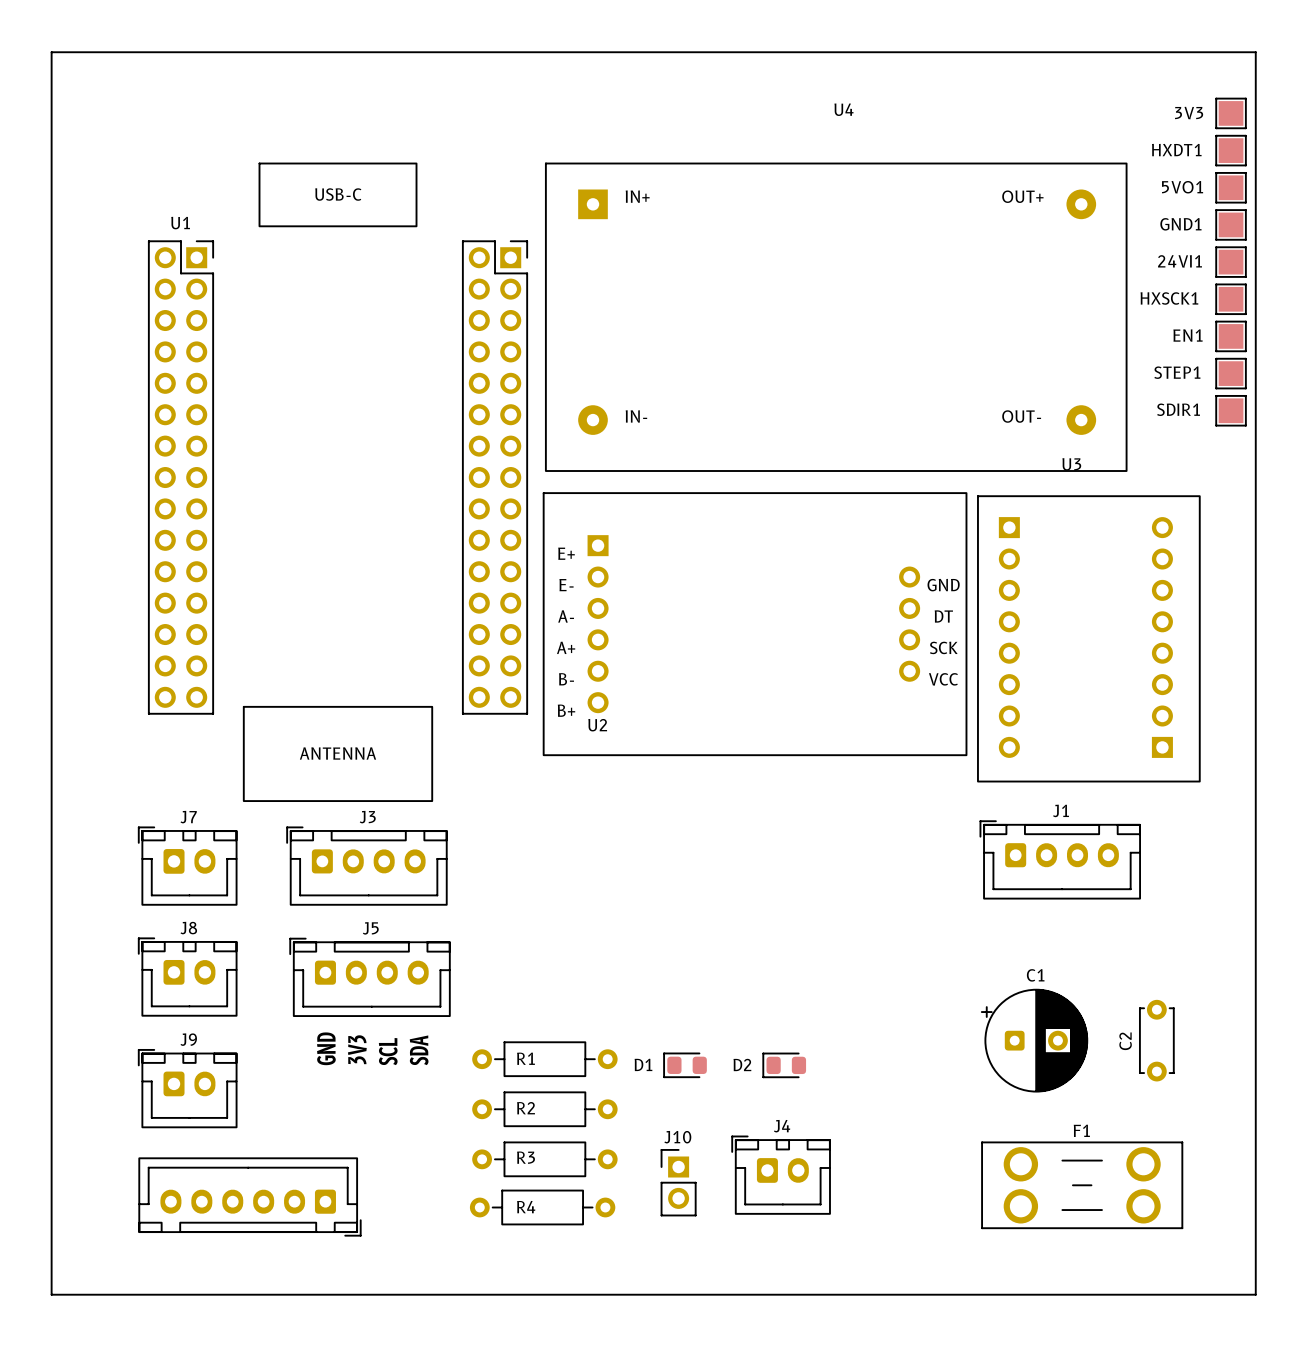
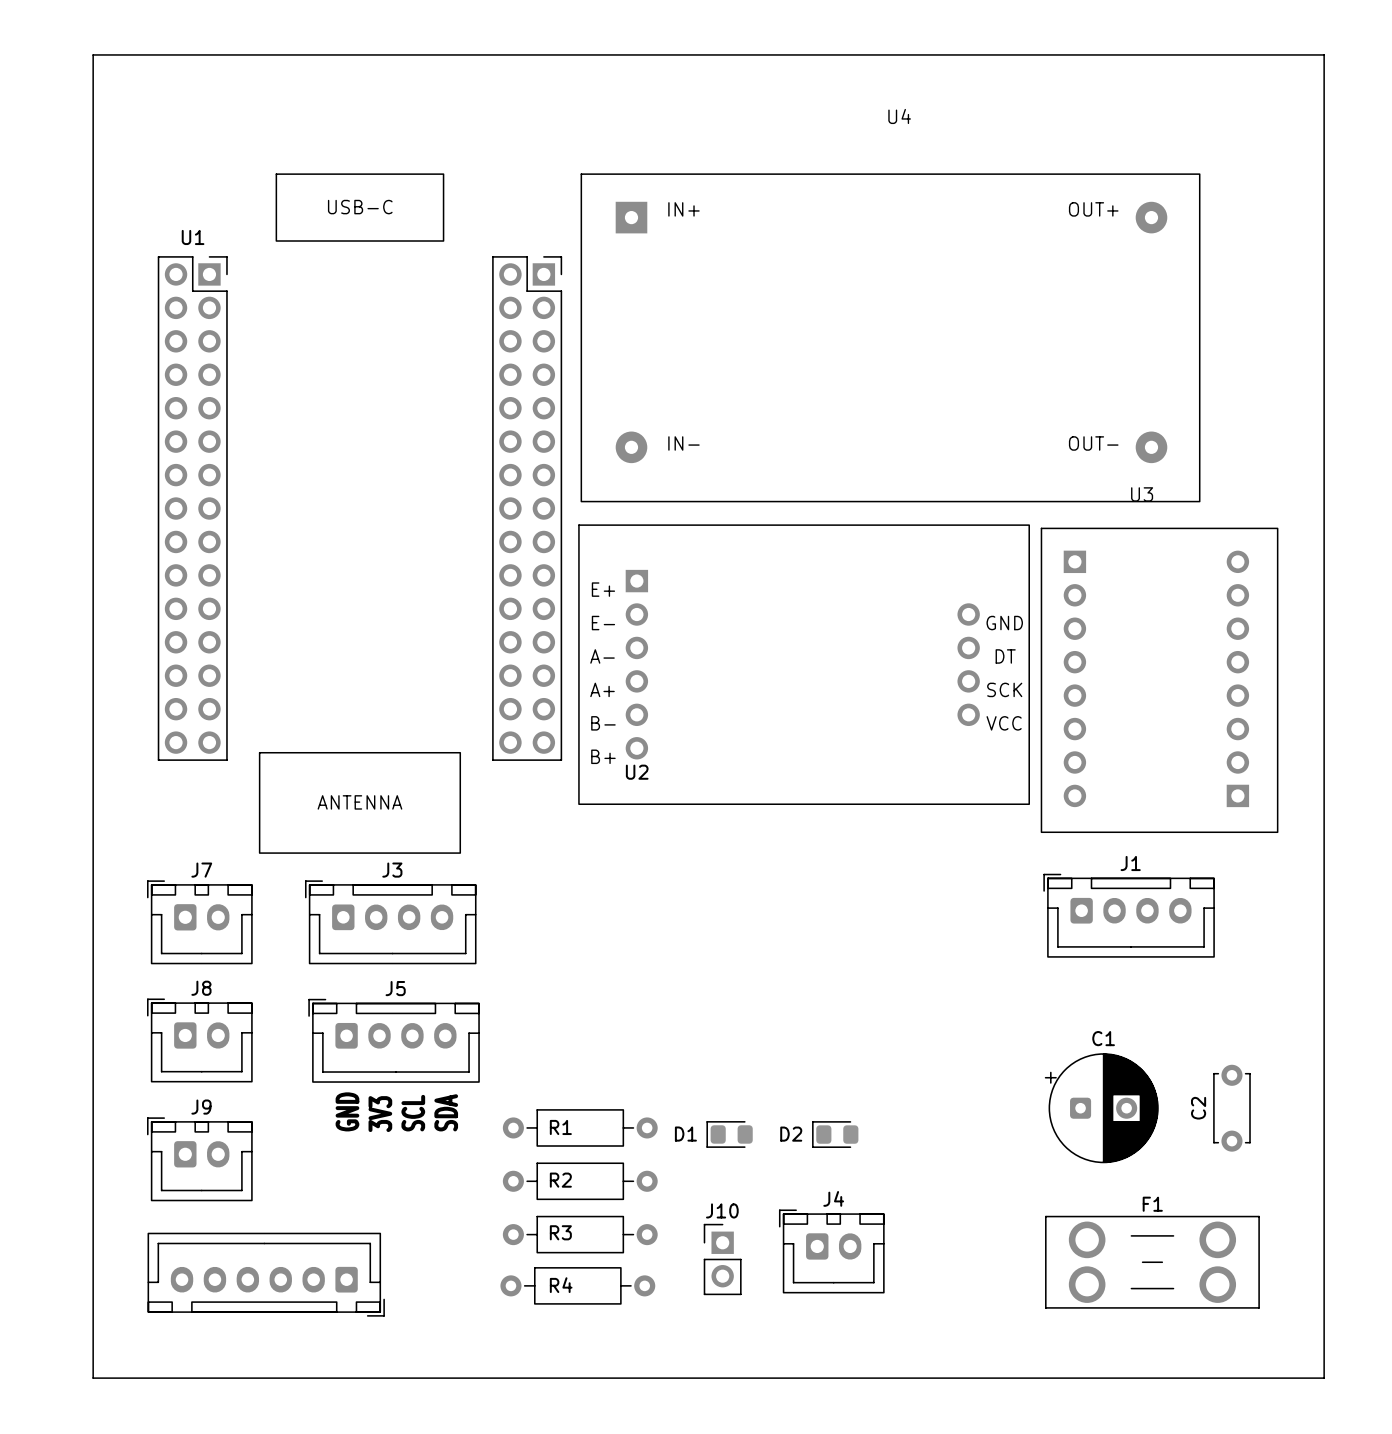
board edge: (51, 52) (1255, 52) (1255, 1294) (51, 1294) (51, 52) -> (93, 54) (93, 1378) (1324, 1378) (1324, 54) (93, 54)
3V3: (1231, 113) -> none
HXDT1: (1231, 150) -> none
5VO1: (1231, 187) -> none
GND1: (1231, 224) -> none
24VI1: (1231, 262) -> none
HXSCK1: (1231, 299) -> none
EN1: (1231, 336) -> none
STEP1: (1231, 373) -> none
SDIR1: (1231, 410) -> none

